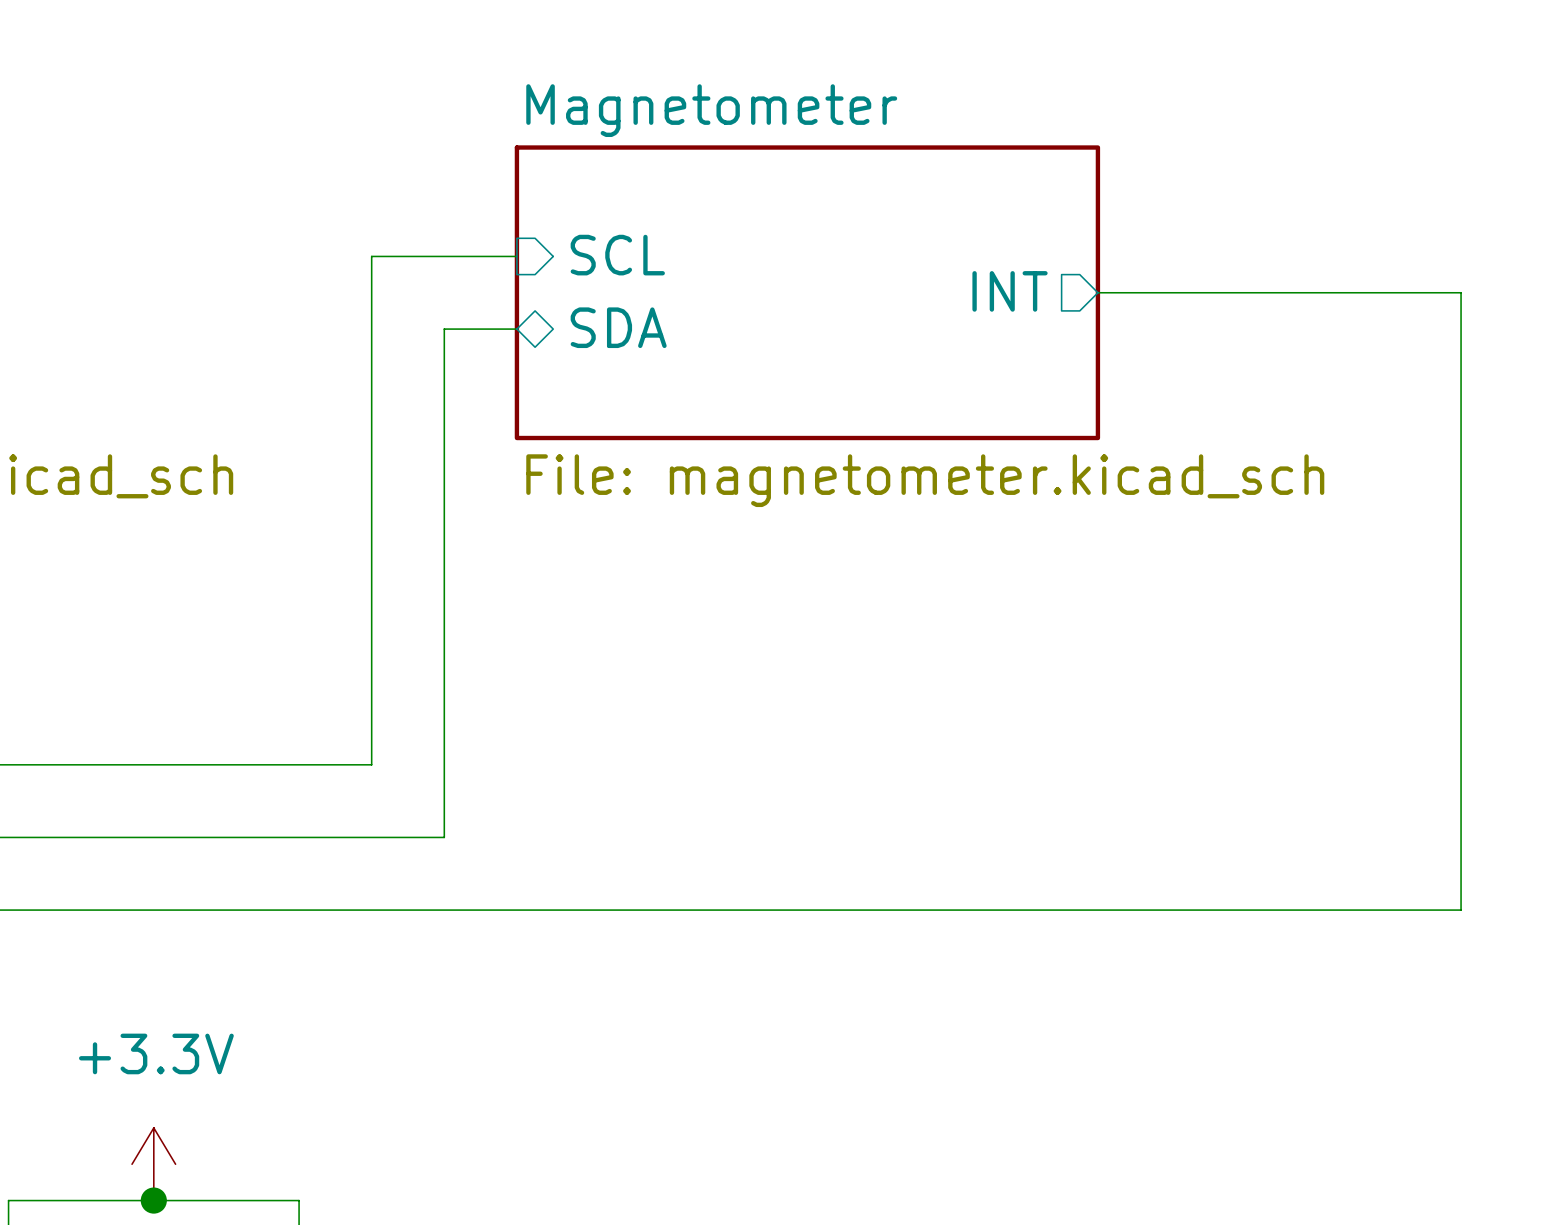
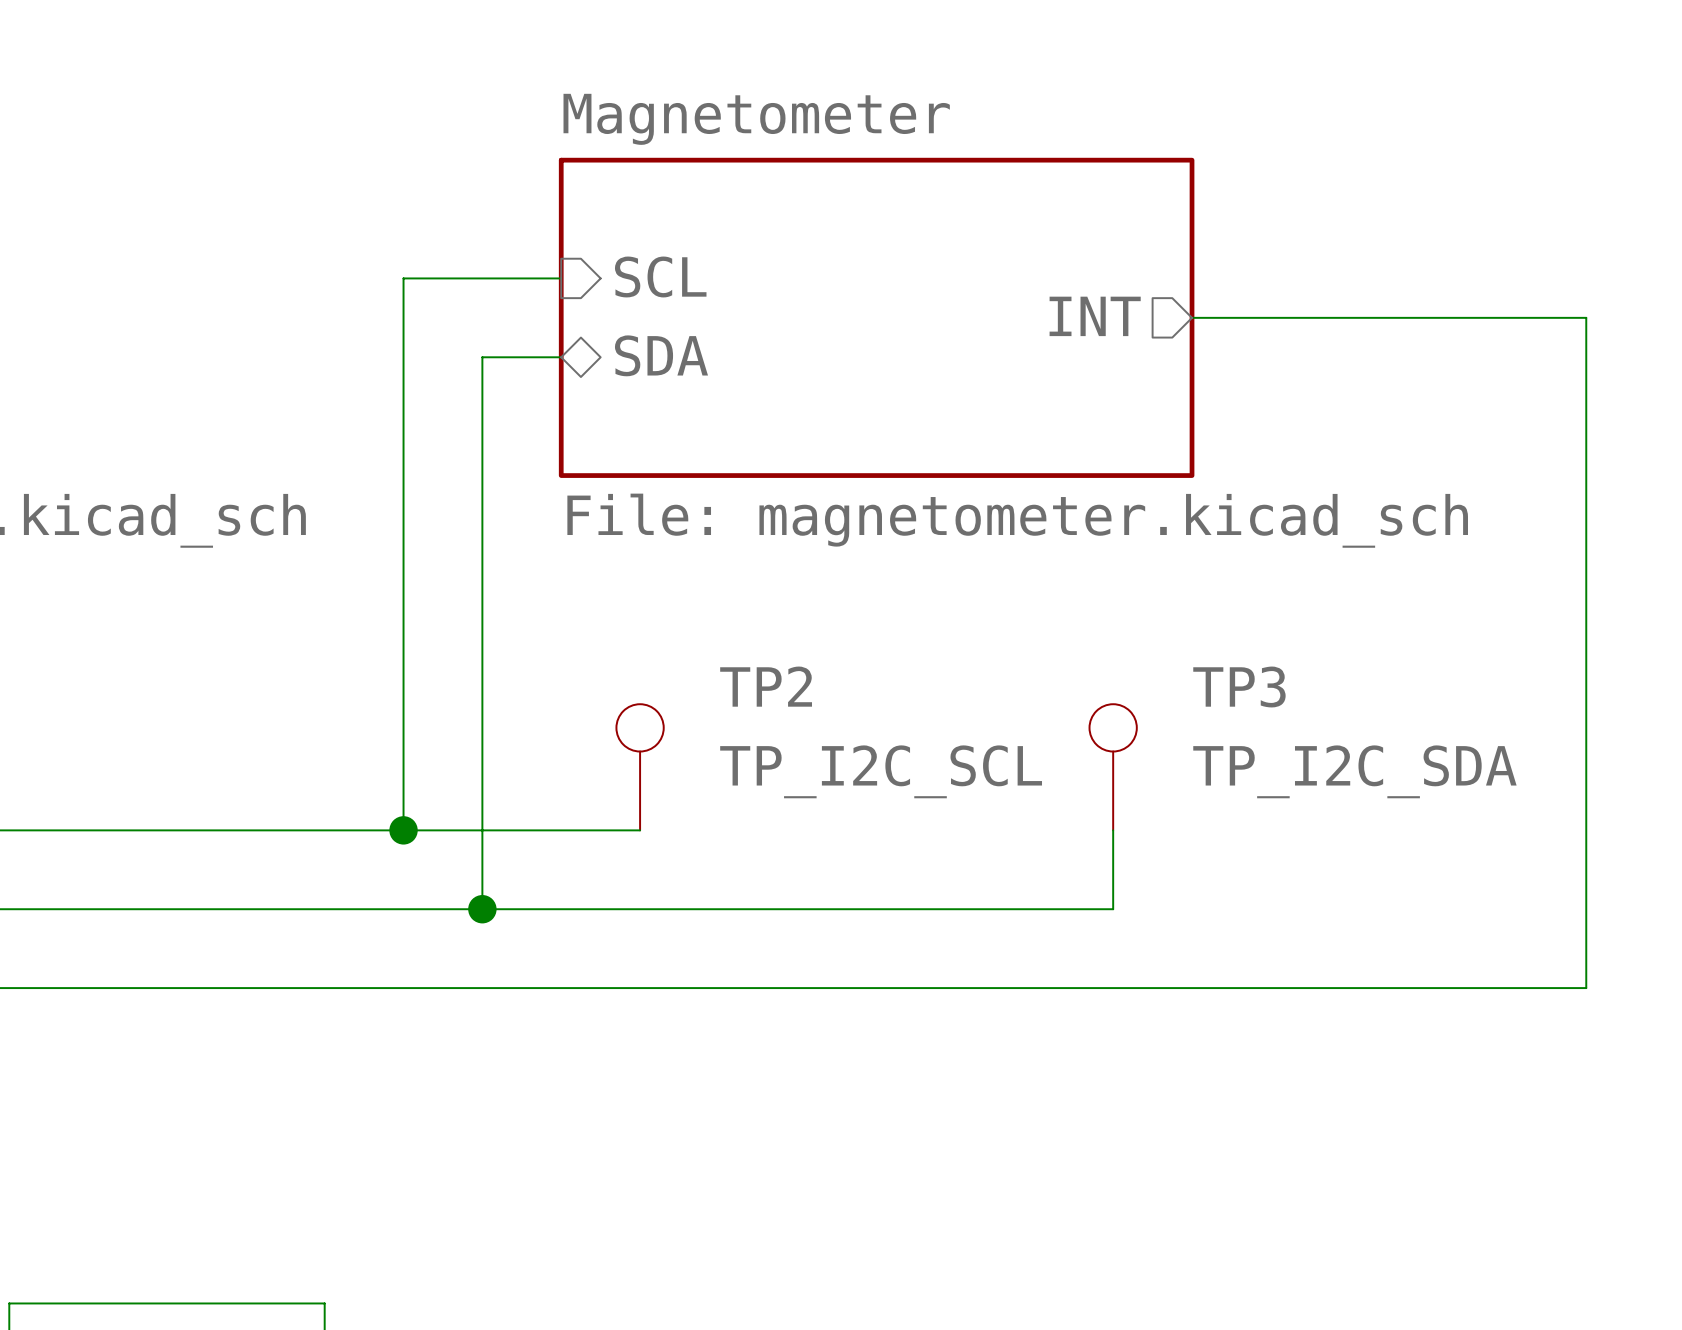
TP2: none -> TP_I2C_SCL (640, 767)
TP3: none -> TP_I2C_SDA (1113, 767)
wire: none -> (403, 830) (640, 830)
junction: none -> (403, 830)
wire: none -> (1113, 830) (1113, 909) (482, 909)
junction: none -> (482, 909)
power symbol: +3.3V (153, 1164) -> none
junction: (153, 1200) -> none

